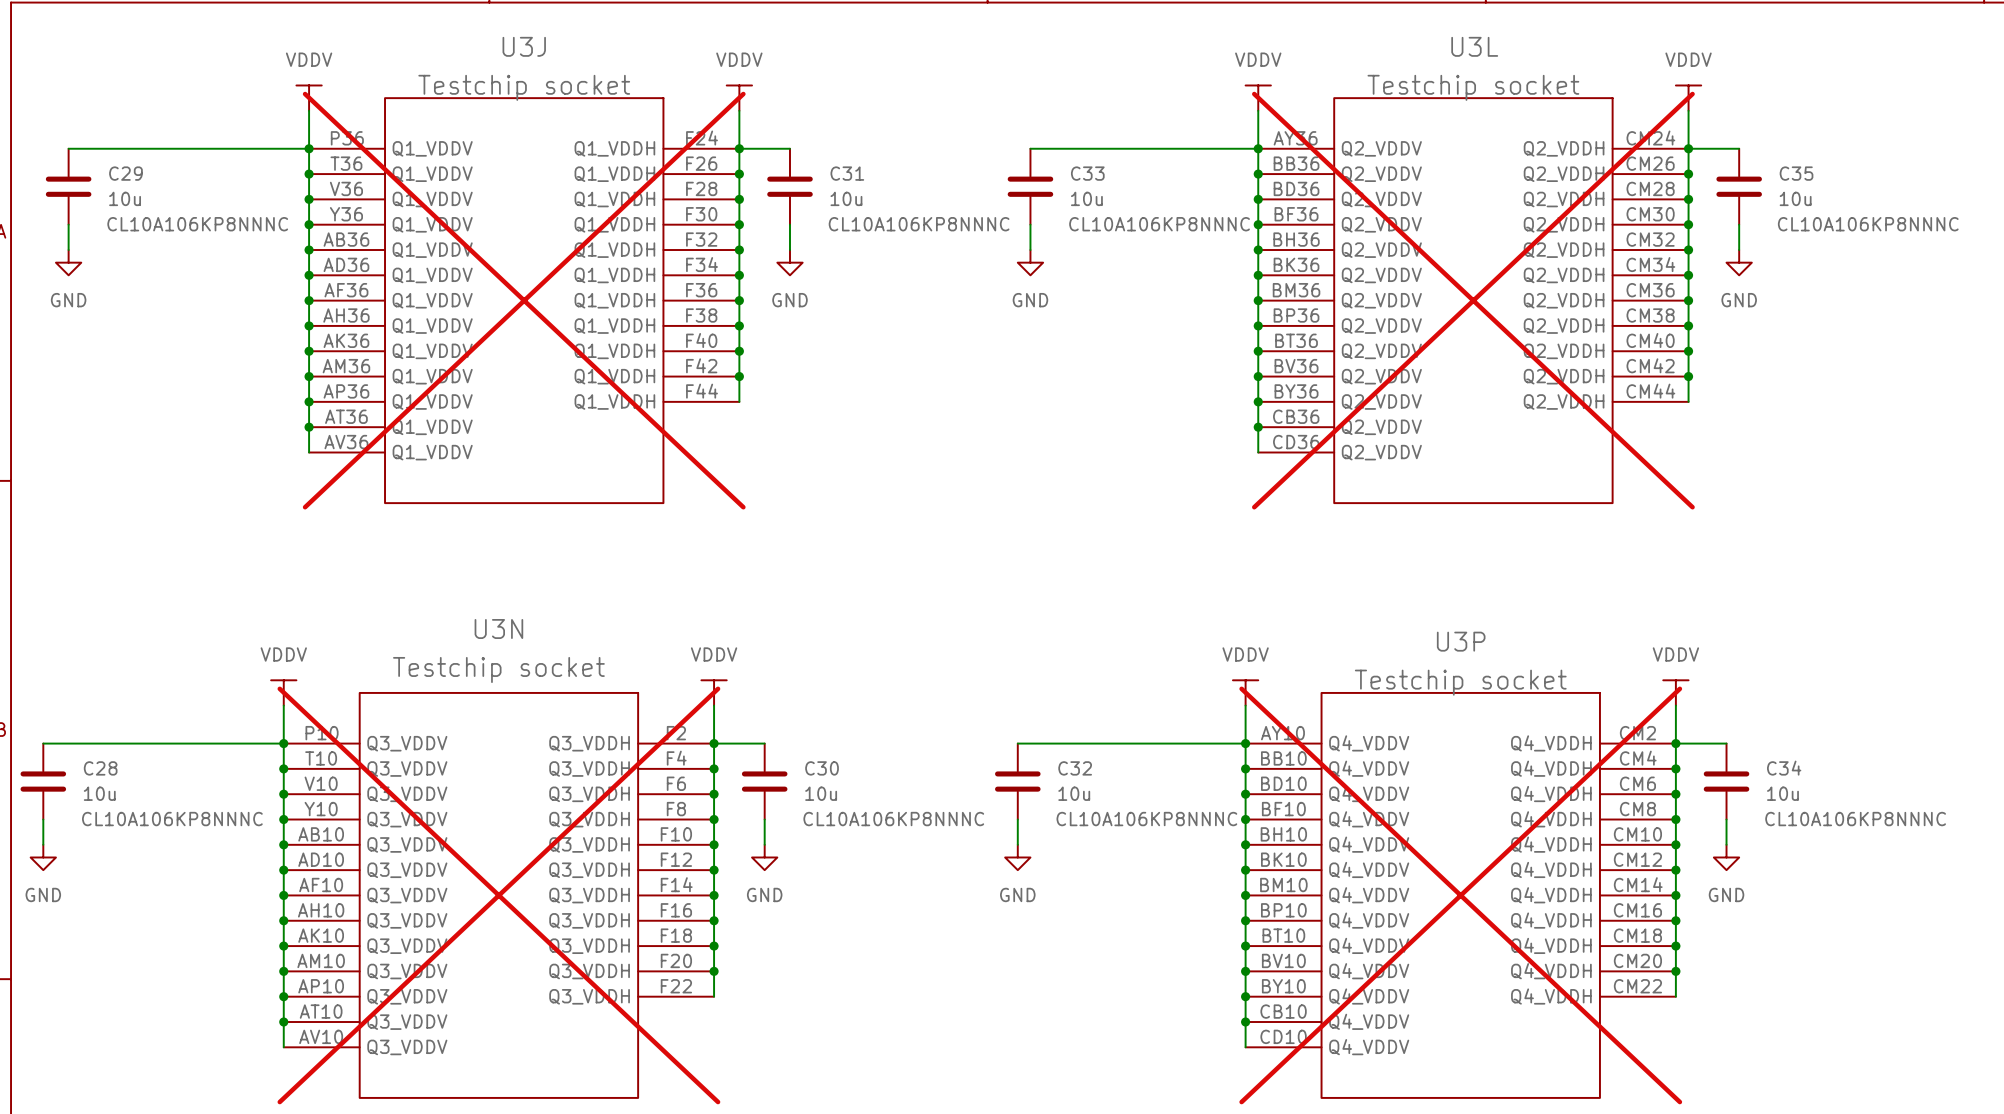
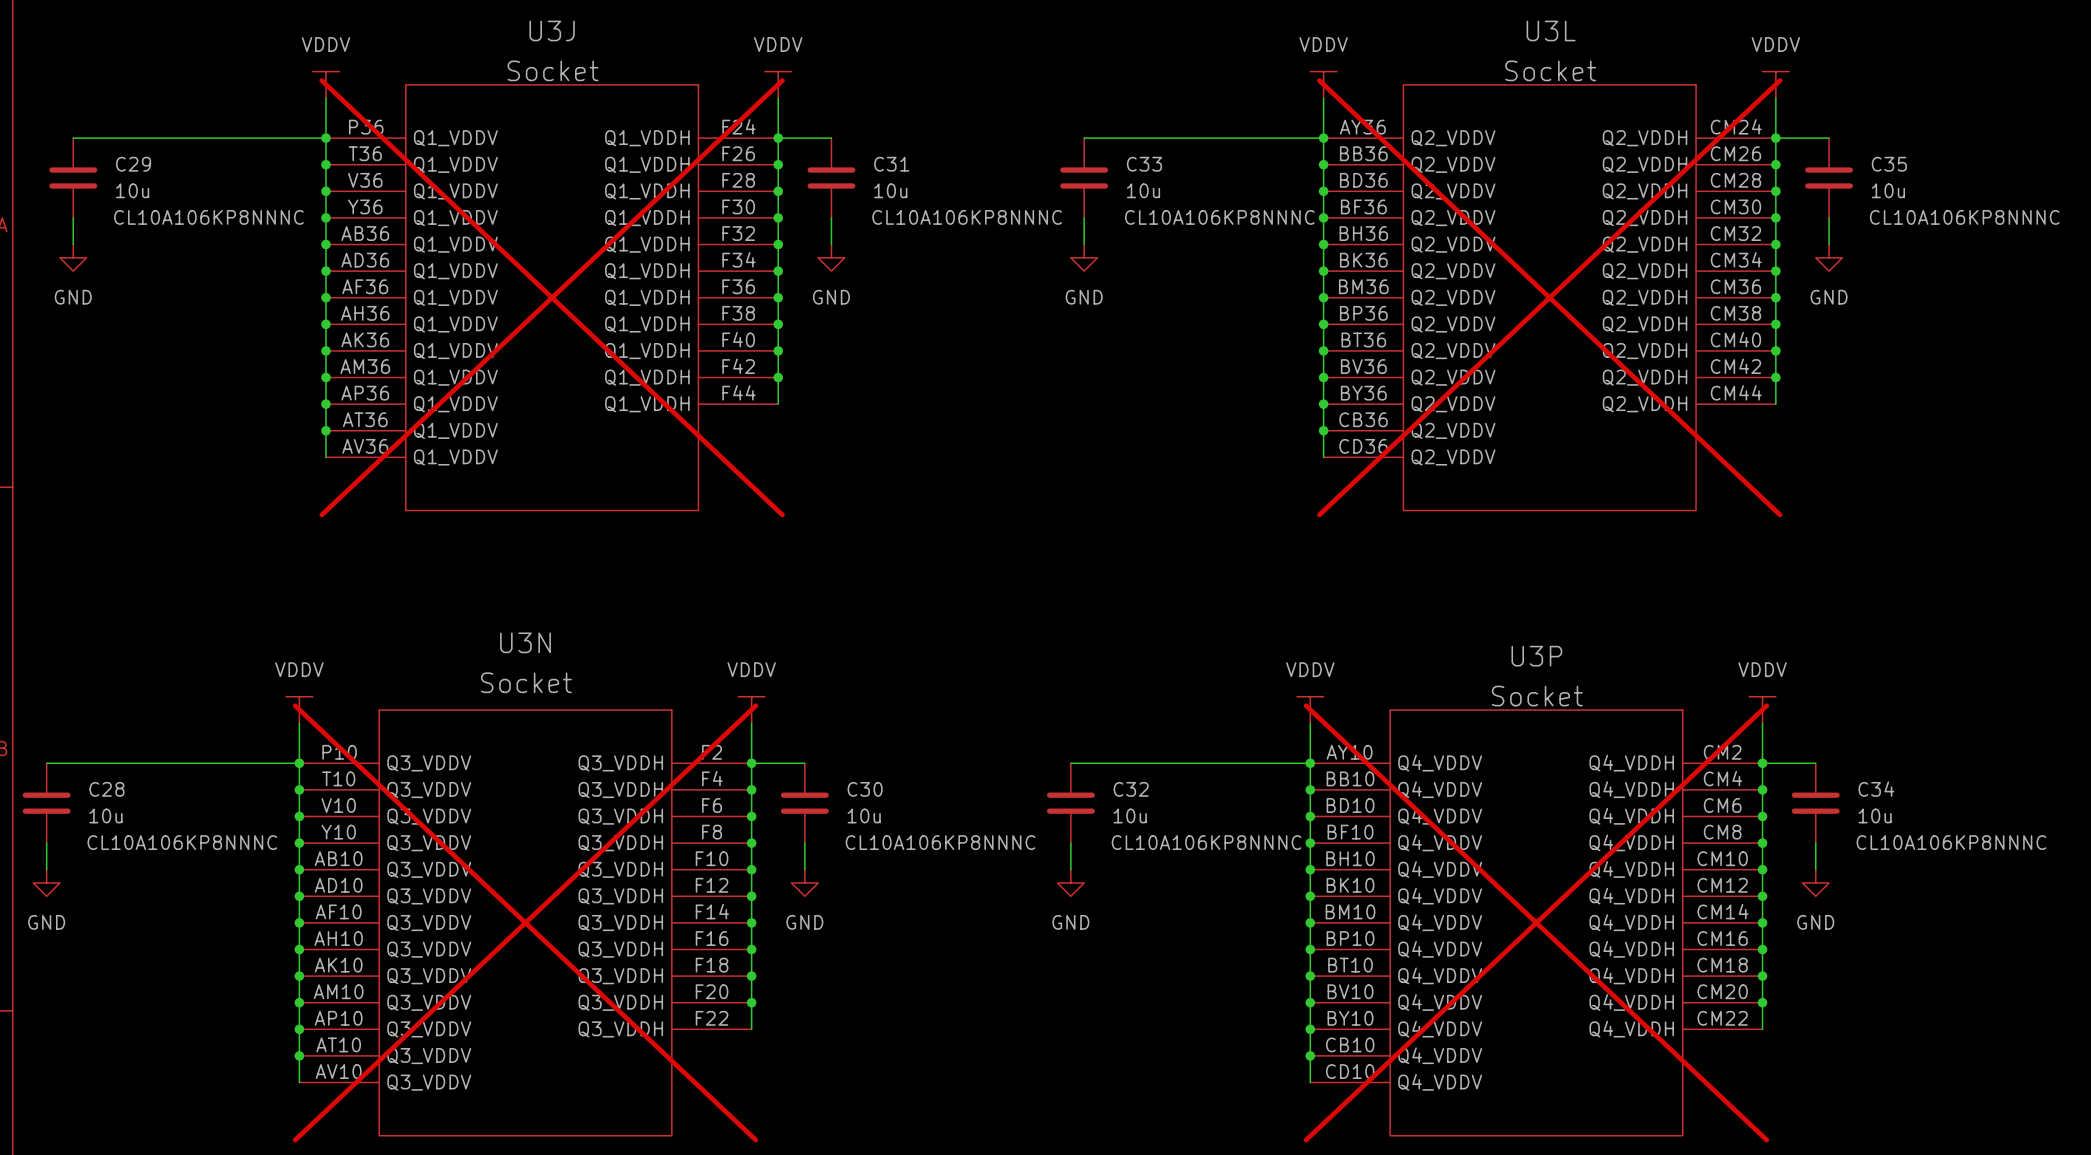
U3J value: Testchip socket (524, 87) -> Socket (553, 70)
U3L value: Testchip socket (1473, 87) -> Socket (1550, 70)
U3N value: Testchip socket (498, 670) -> Socket (526, 682)
U3P value: Testchip socket (1460, 682) -> Socket (1537, 696)

